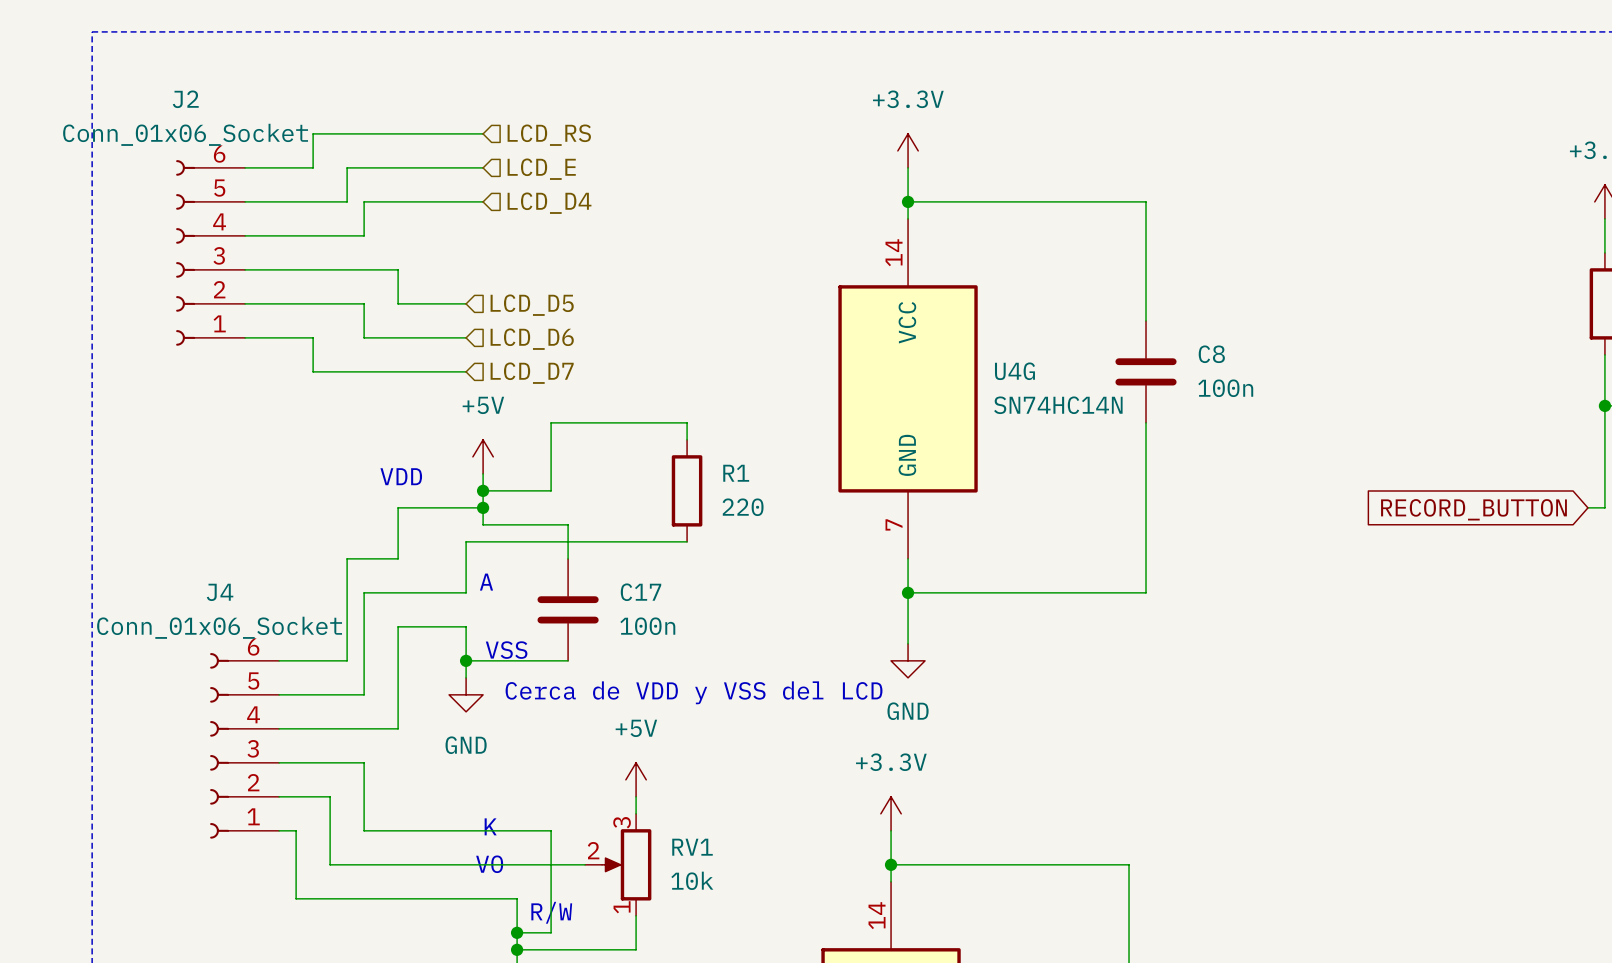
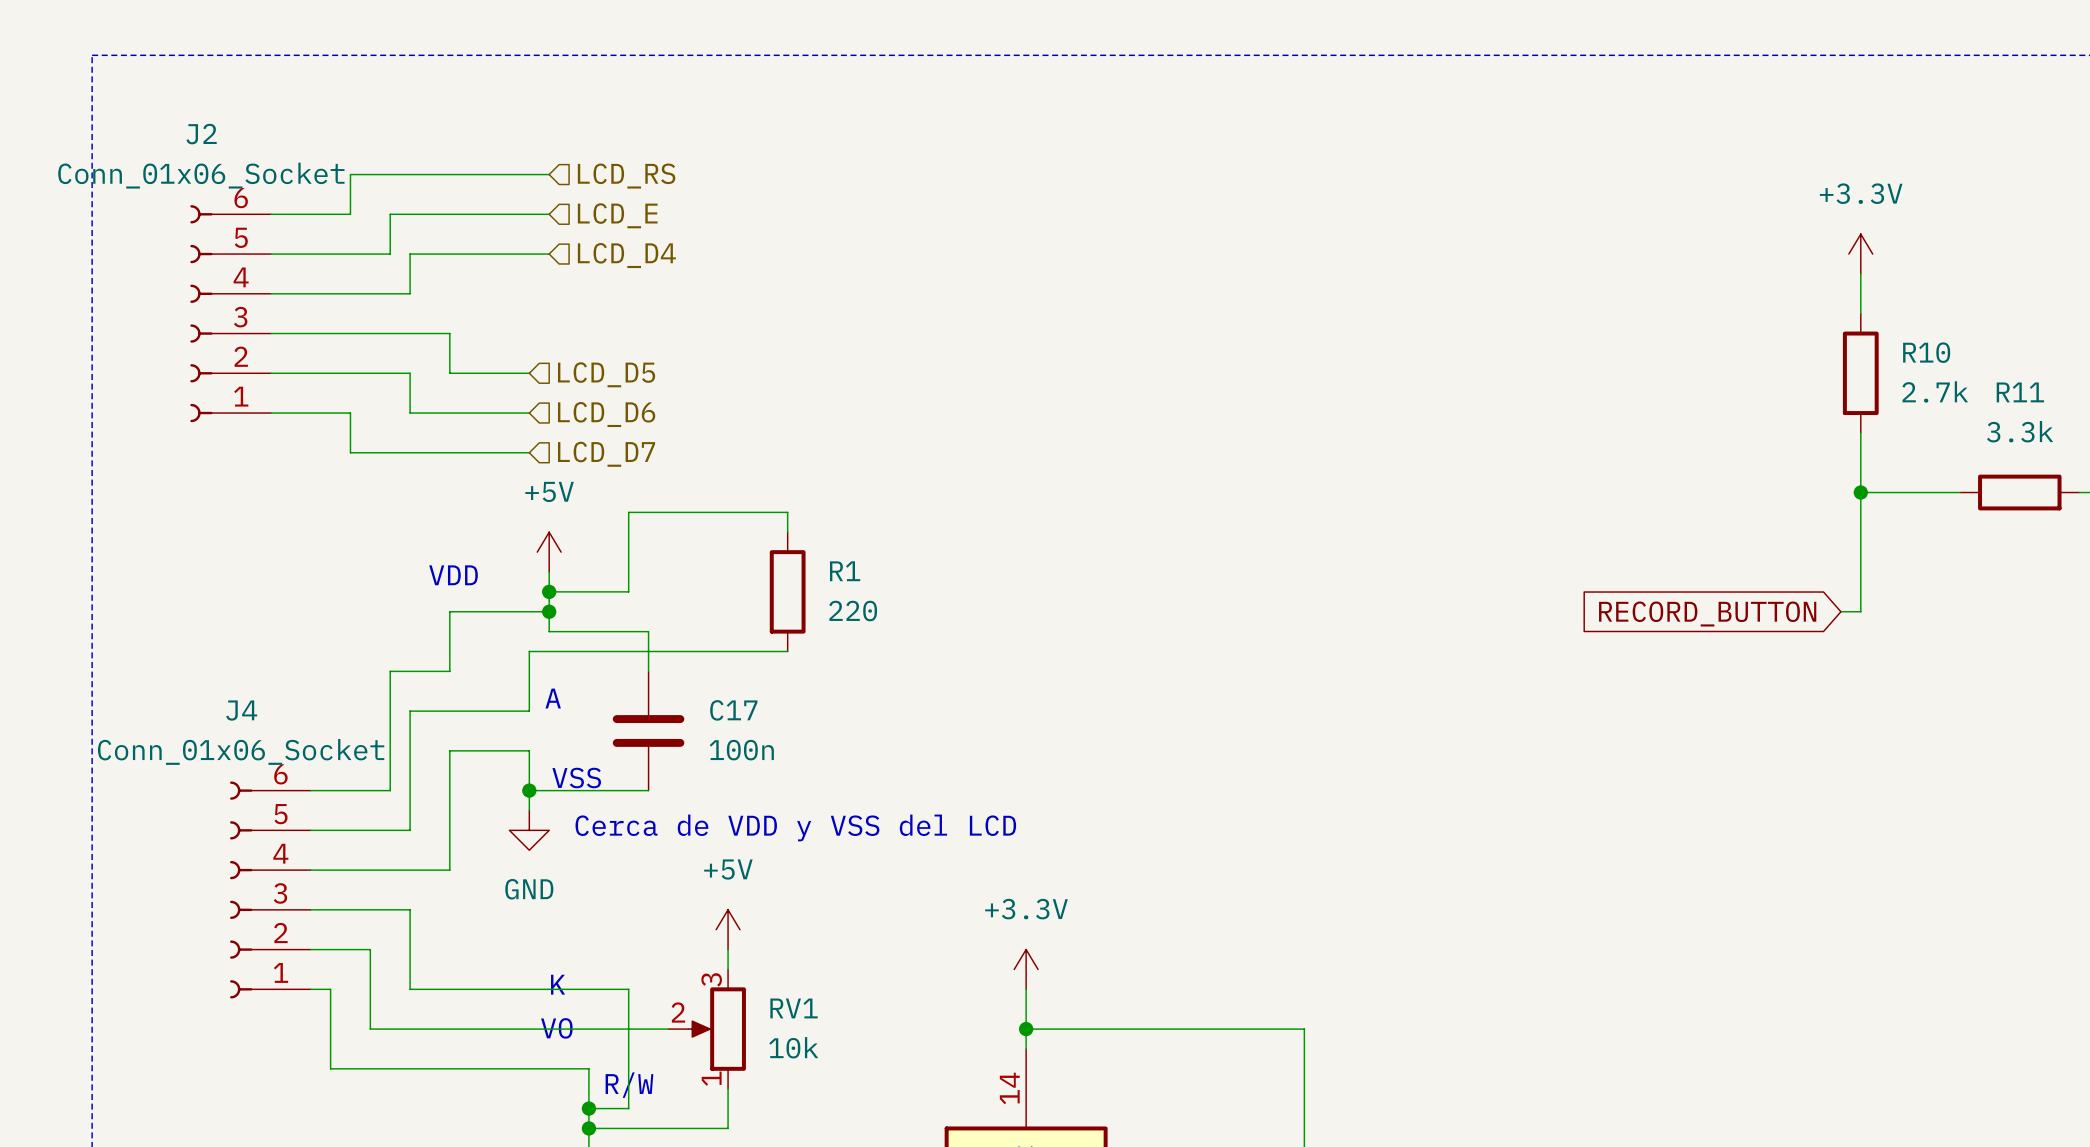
power symbol: +3.3V (908, 150) -> none
wire: (908, 167) (908, 218) -> none
wire: (908, 201) (1146, 201) (1146, 320) -> none
junction: (908, 201) -> none
C8: 100n (1146, 371) -> none
U4G: SN74HC14N (908, 388) -> none
wire: (1146, 422) (1146, 592) (908, 592) -> none
wire: (908, 558) (908, 643) -> none
junction: (908, 592) -> none
power symbol: GND (908, 660) -> none

